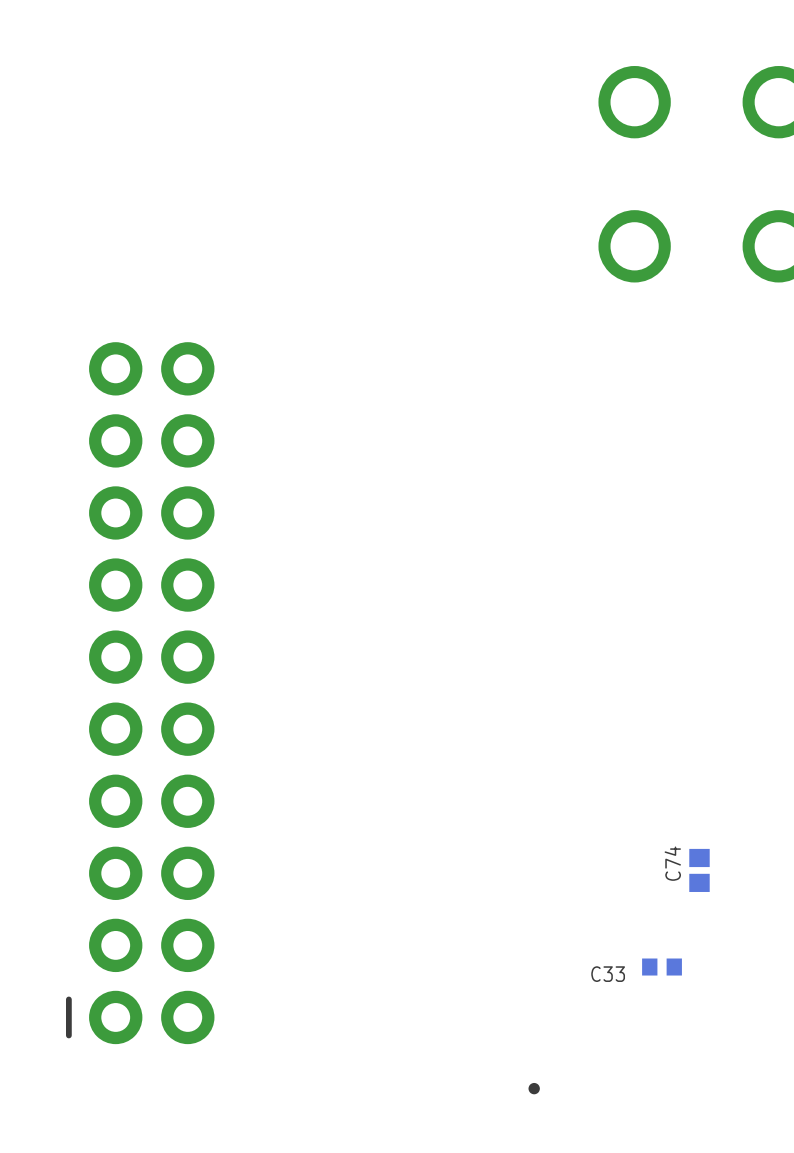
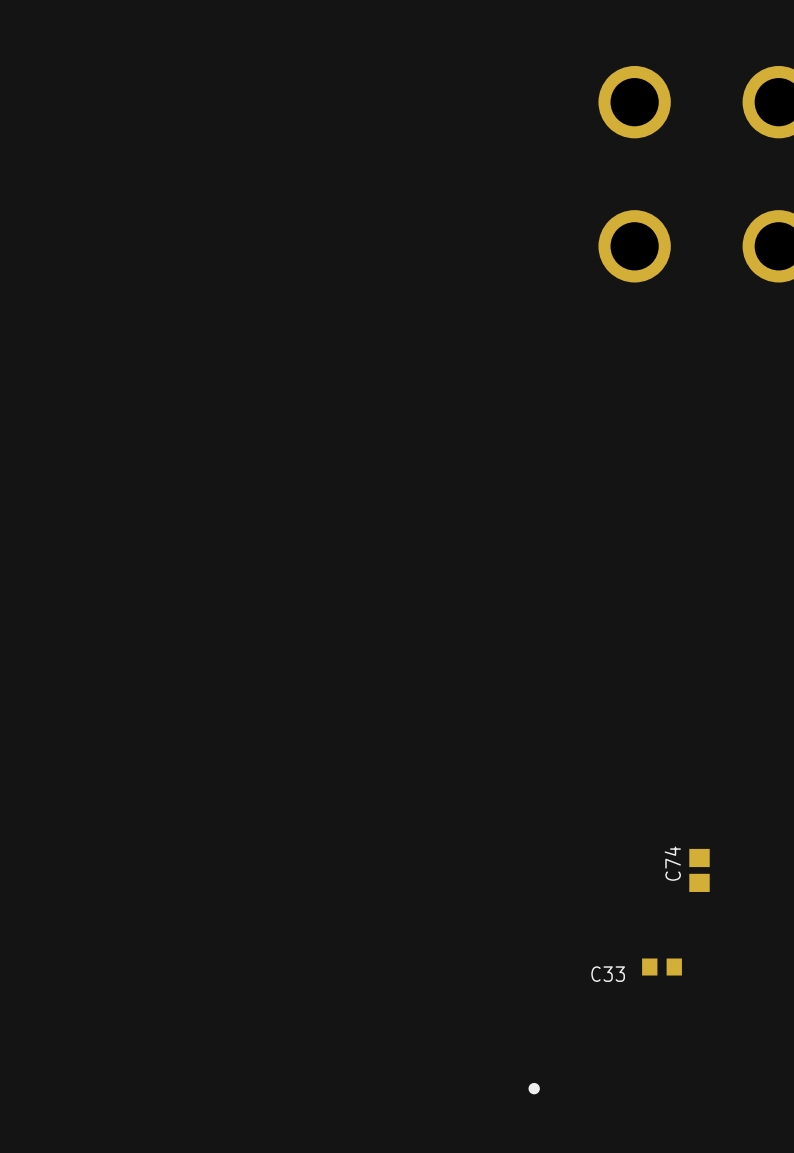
part: (140, 693) -> none

